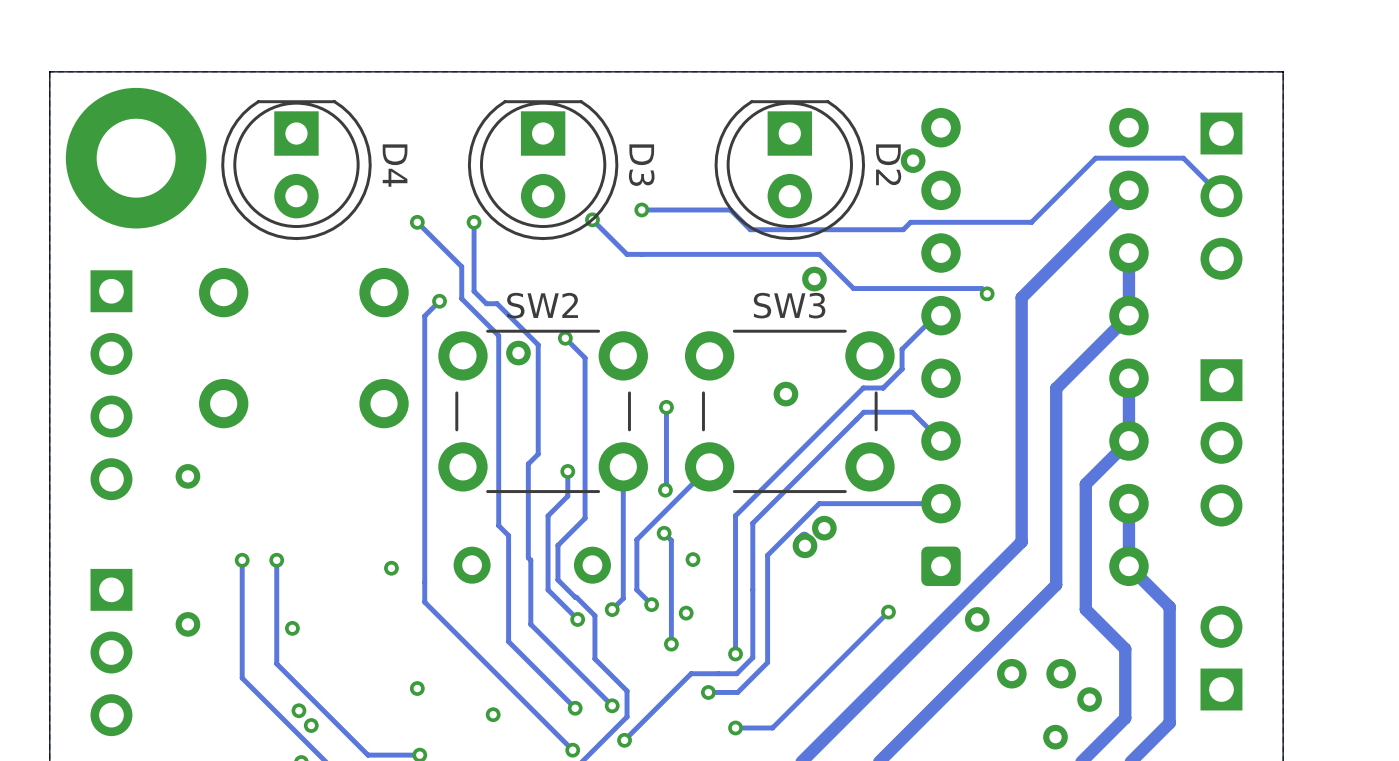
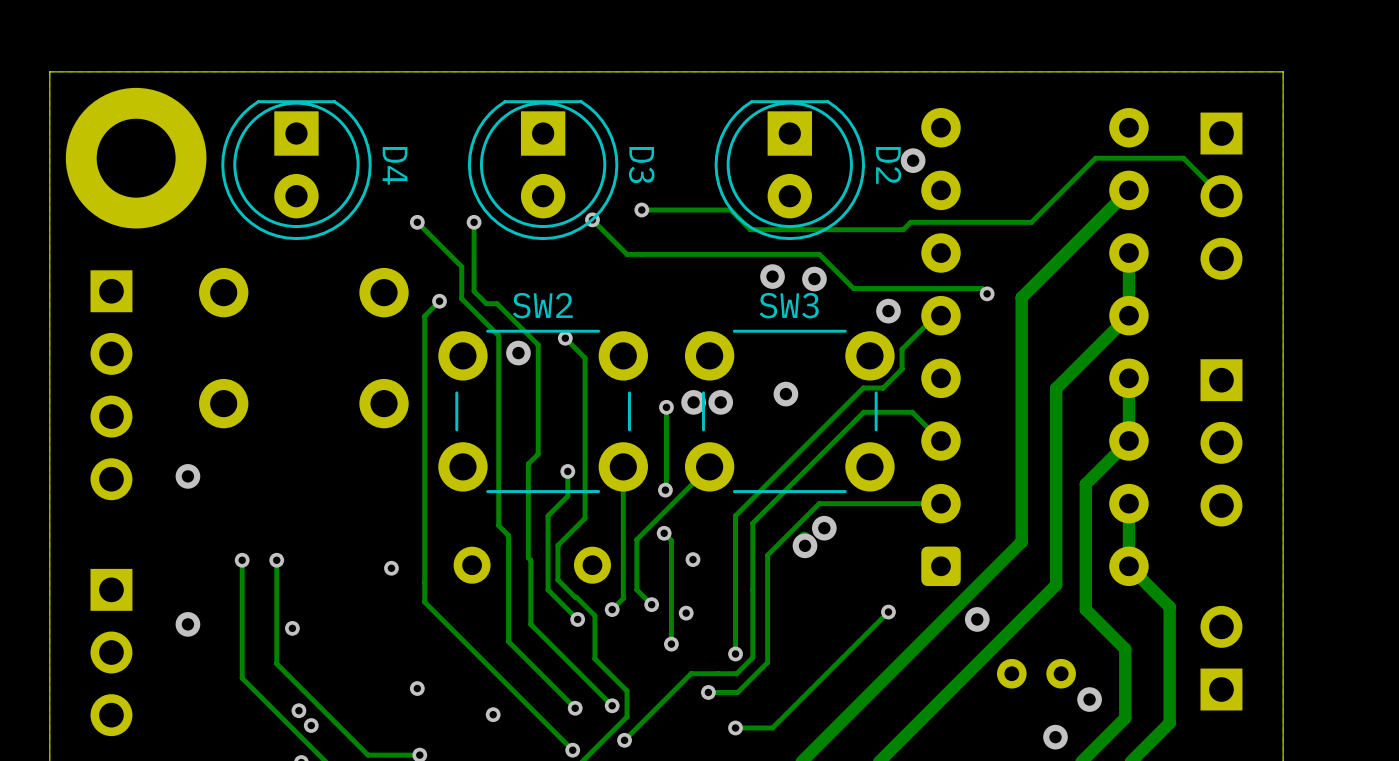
via: none -> (772, 276)
via: none -> (888, 311)
via: none -> (693, 402)
via: none -> (720, 402)

